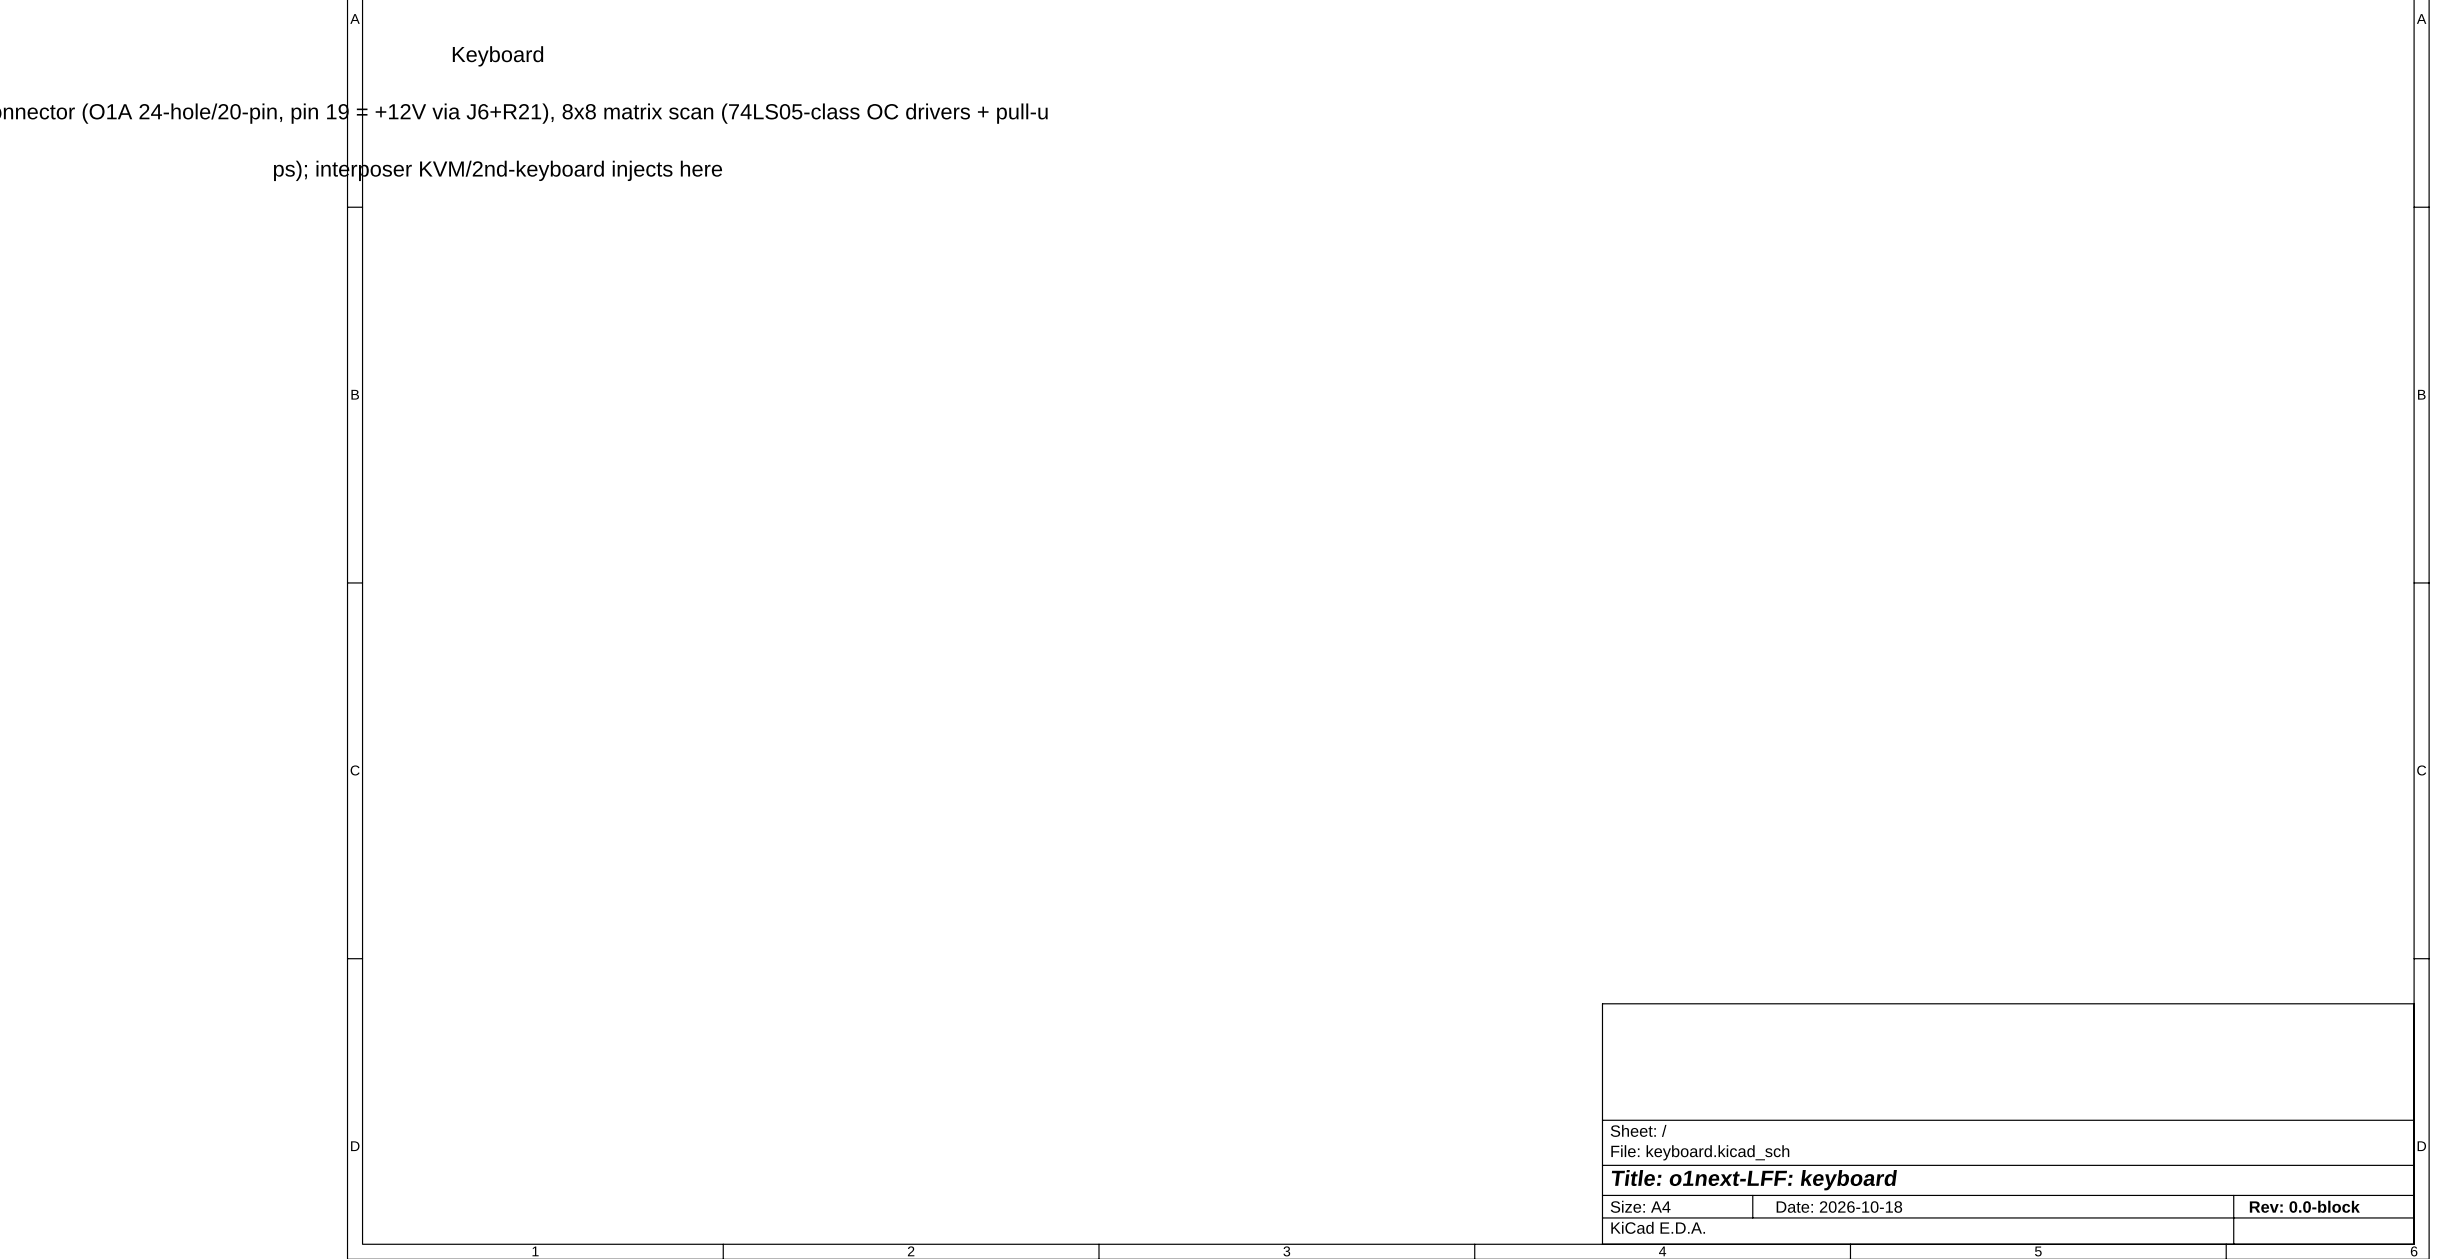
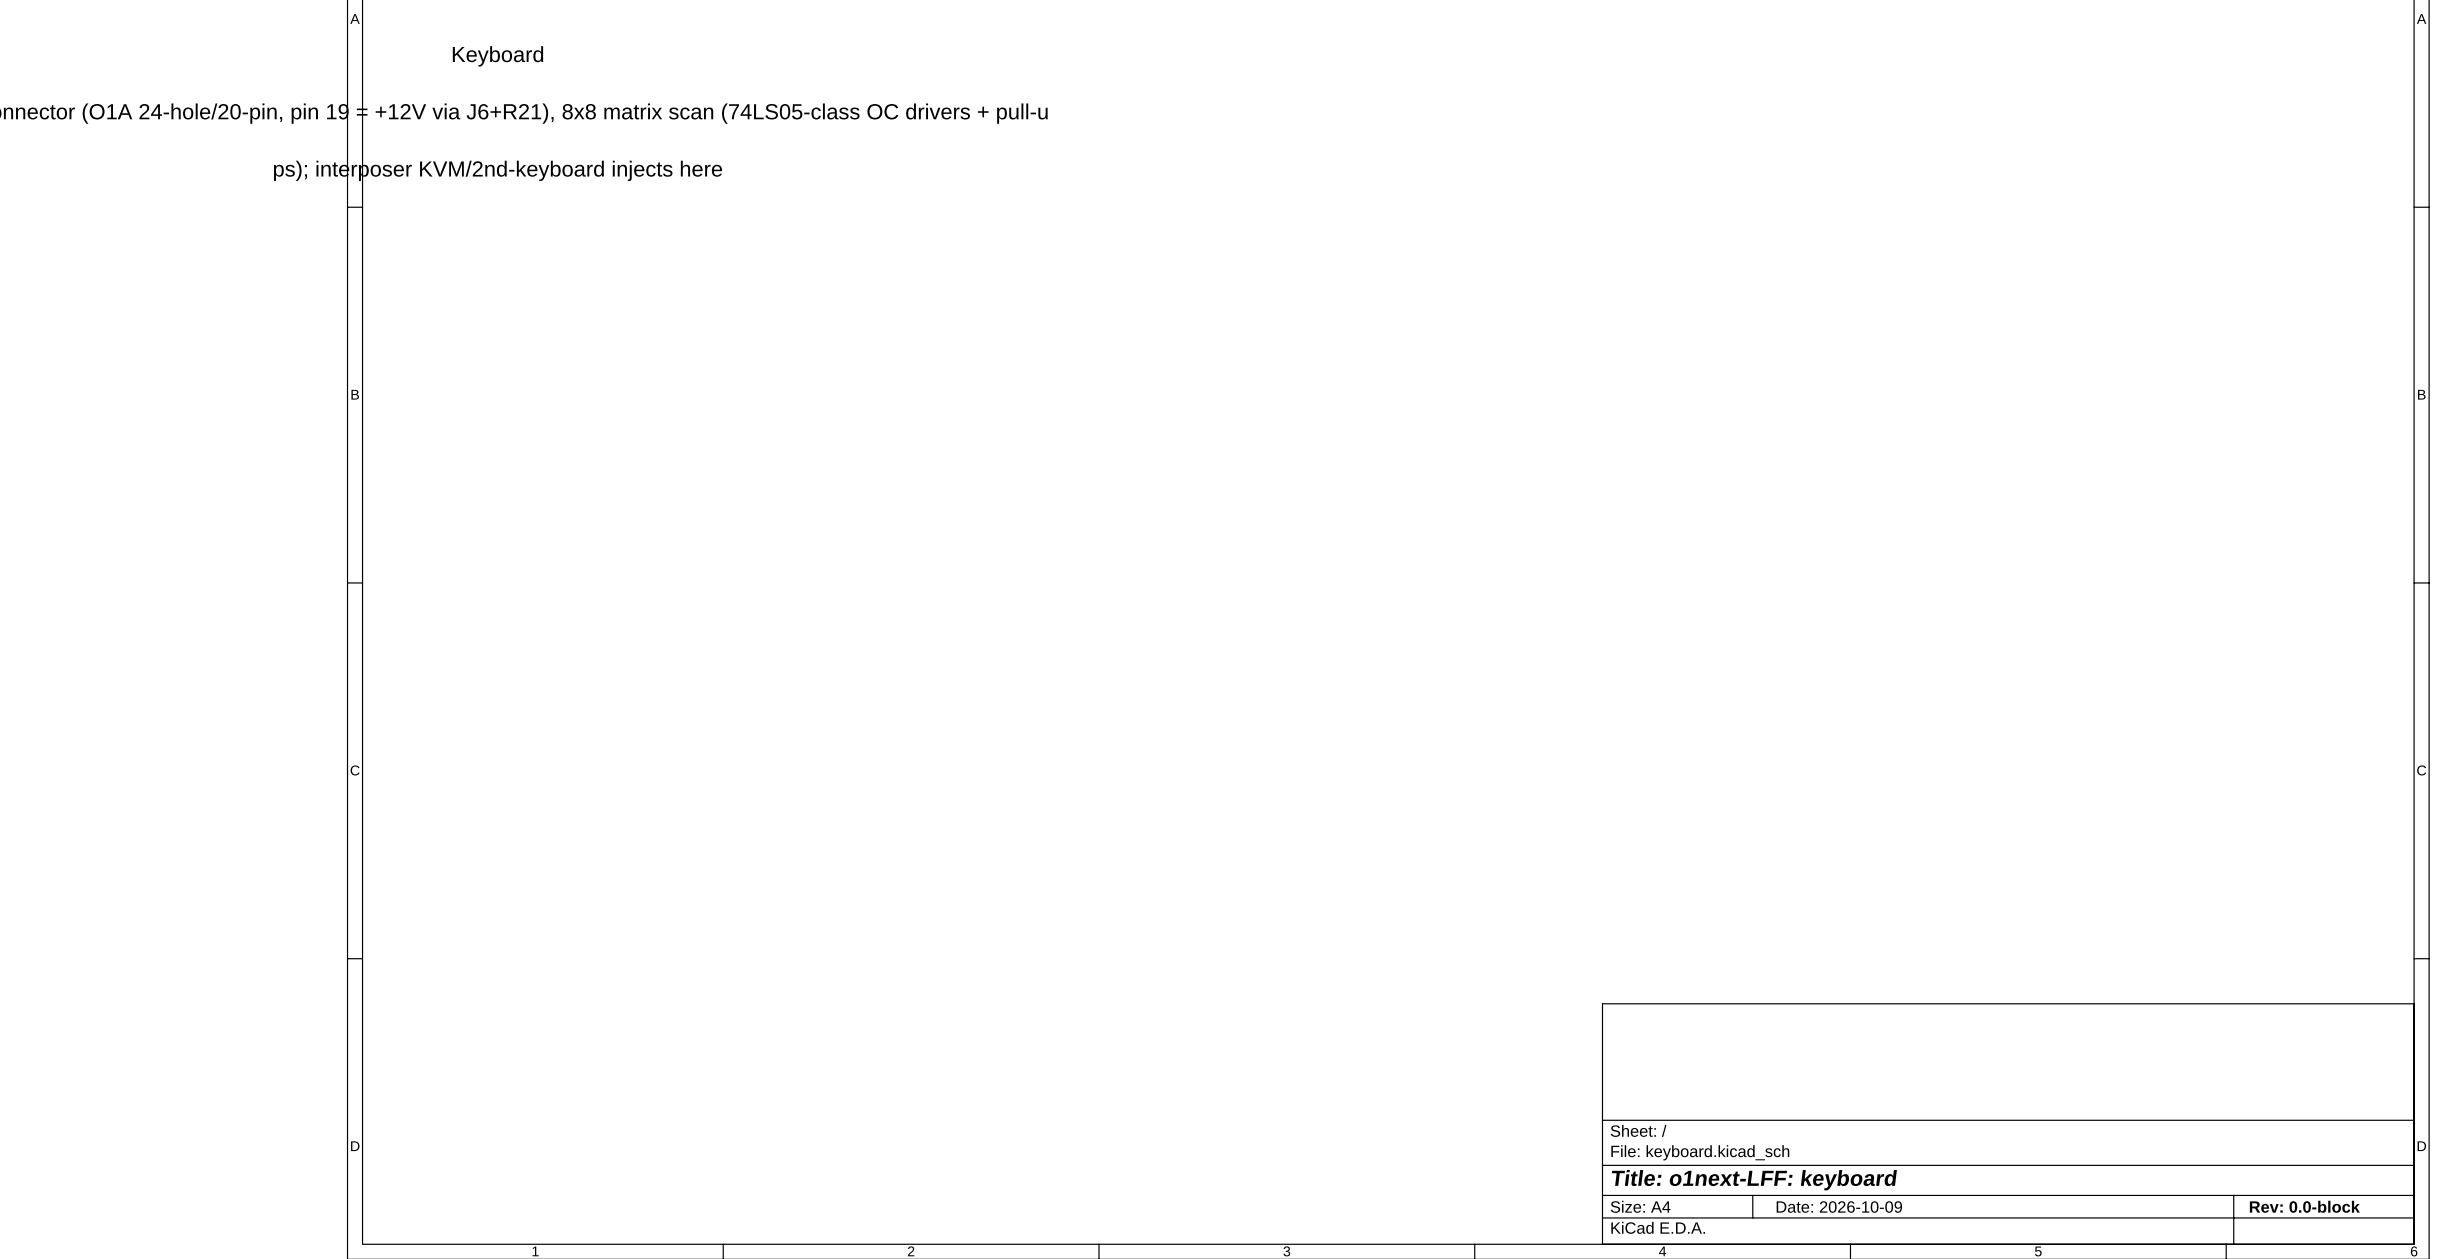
title block: Date: 2026-10-18 (1839, 1207) -> Date: 2026-10-09 (1839, 1207)

